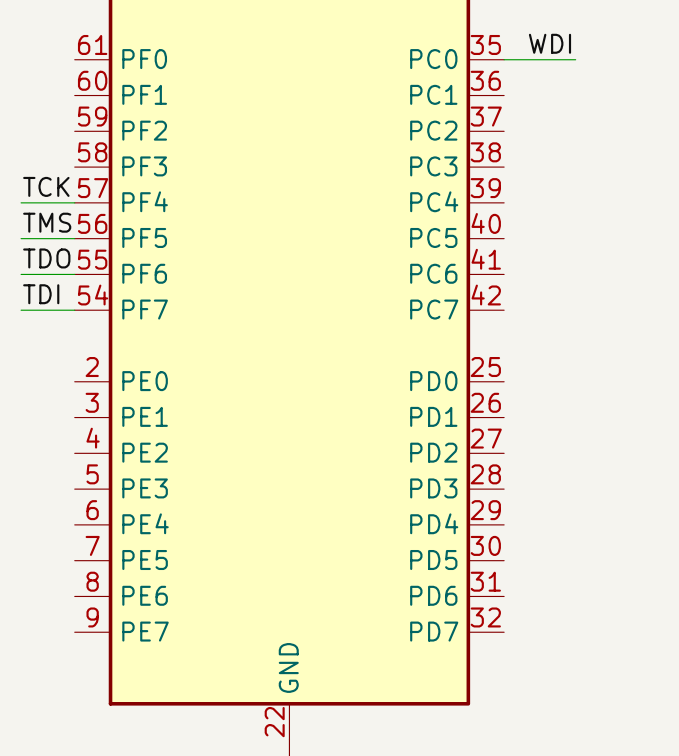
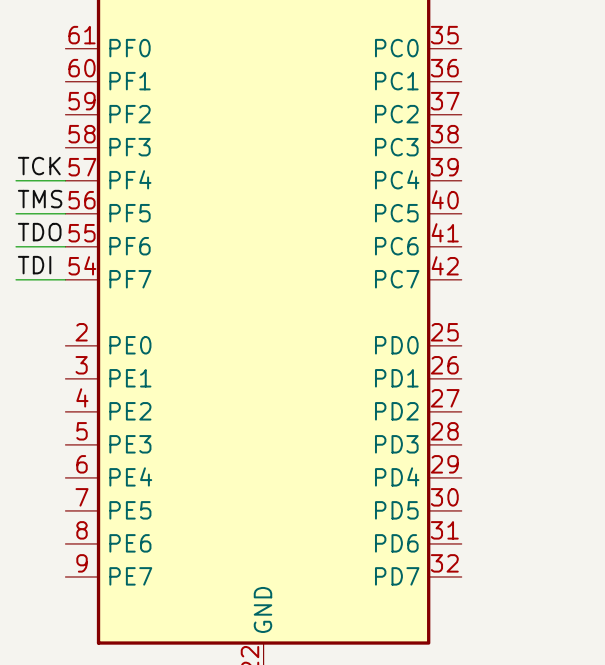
label: WDI (549, 43) -> none
wire: (504, 59) (575, 59) -> none

